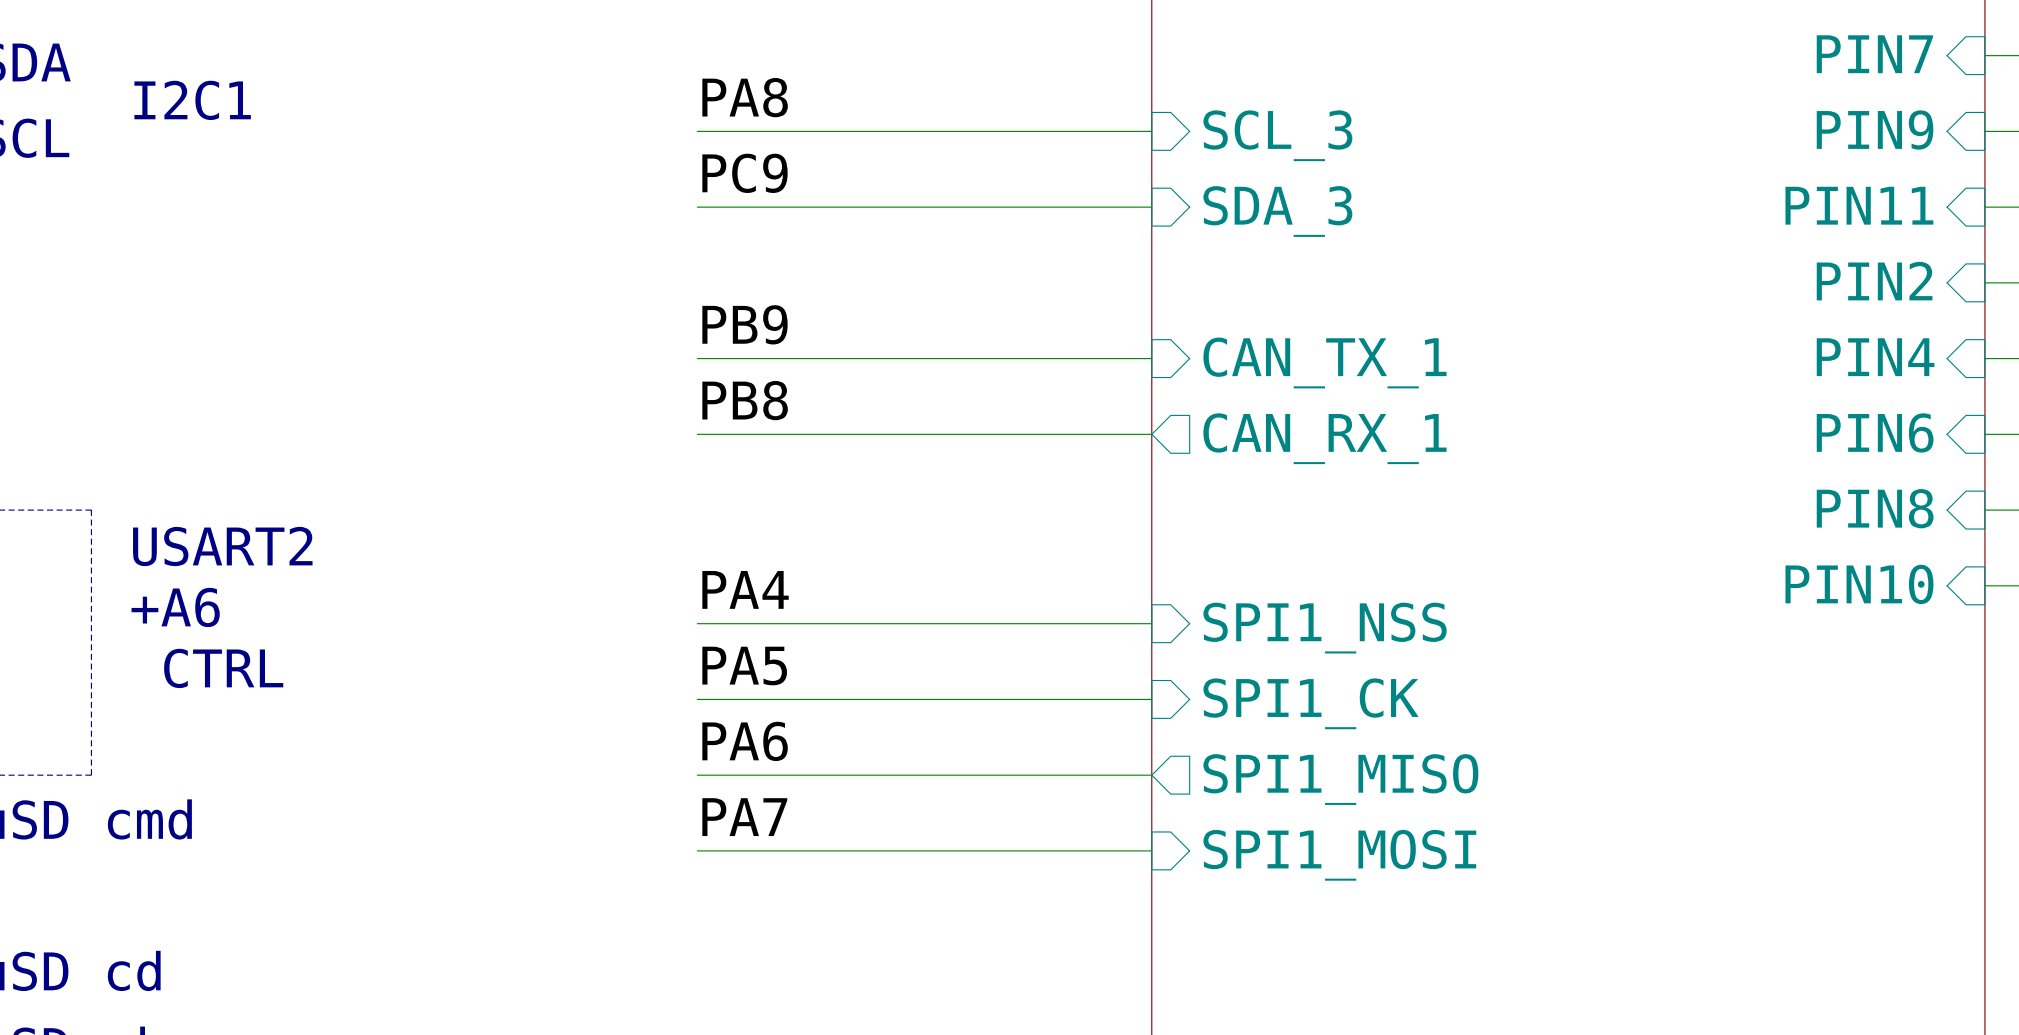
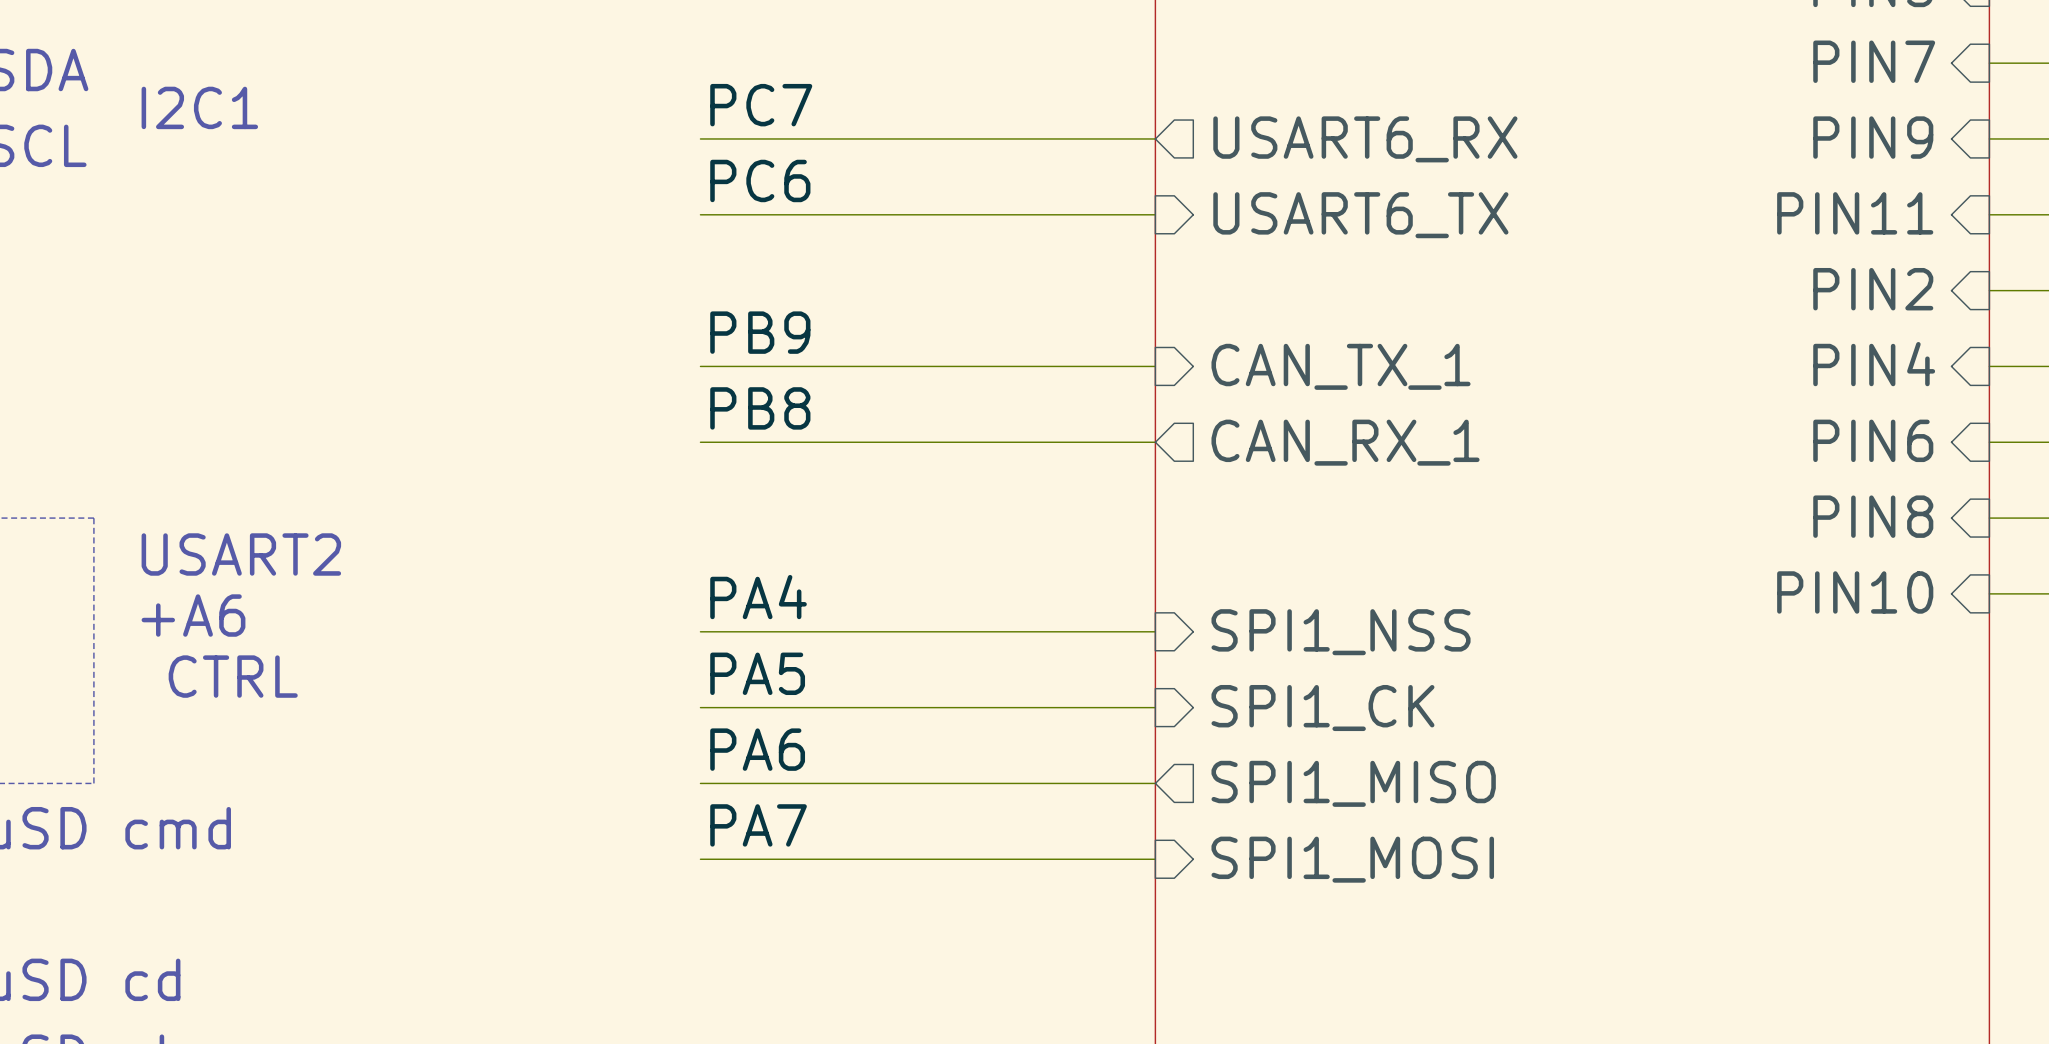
label: PA8 (745, 97) -> PC7 (761, 105)
sheet pin shape: input (1277, 135) -> output (1365, 139)
sheet pin: SCL_3 (1277, 135) -> USART6_RX (1365, 139)
label: PC9 (745, 173) -> PC6 (760, 180)
sheet pin: SDA_3 (1277, 211) -> USART6_TX (1360, 215)

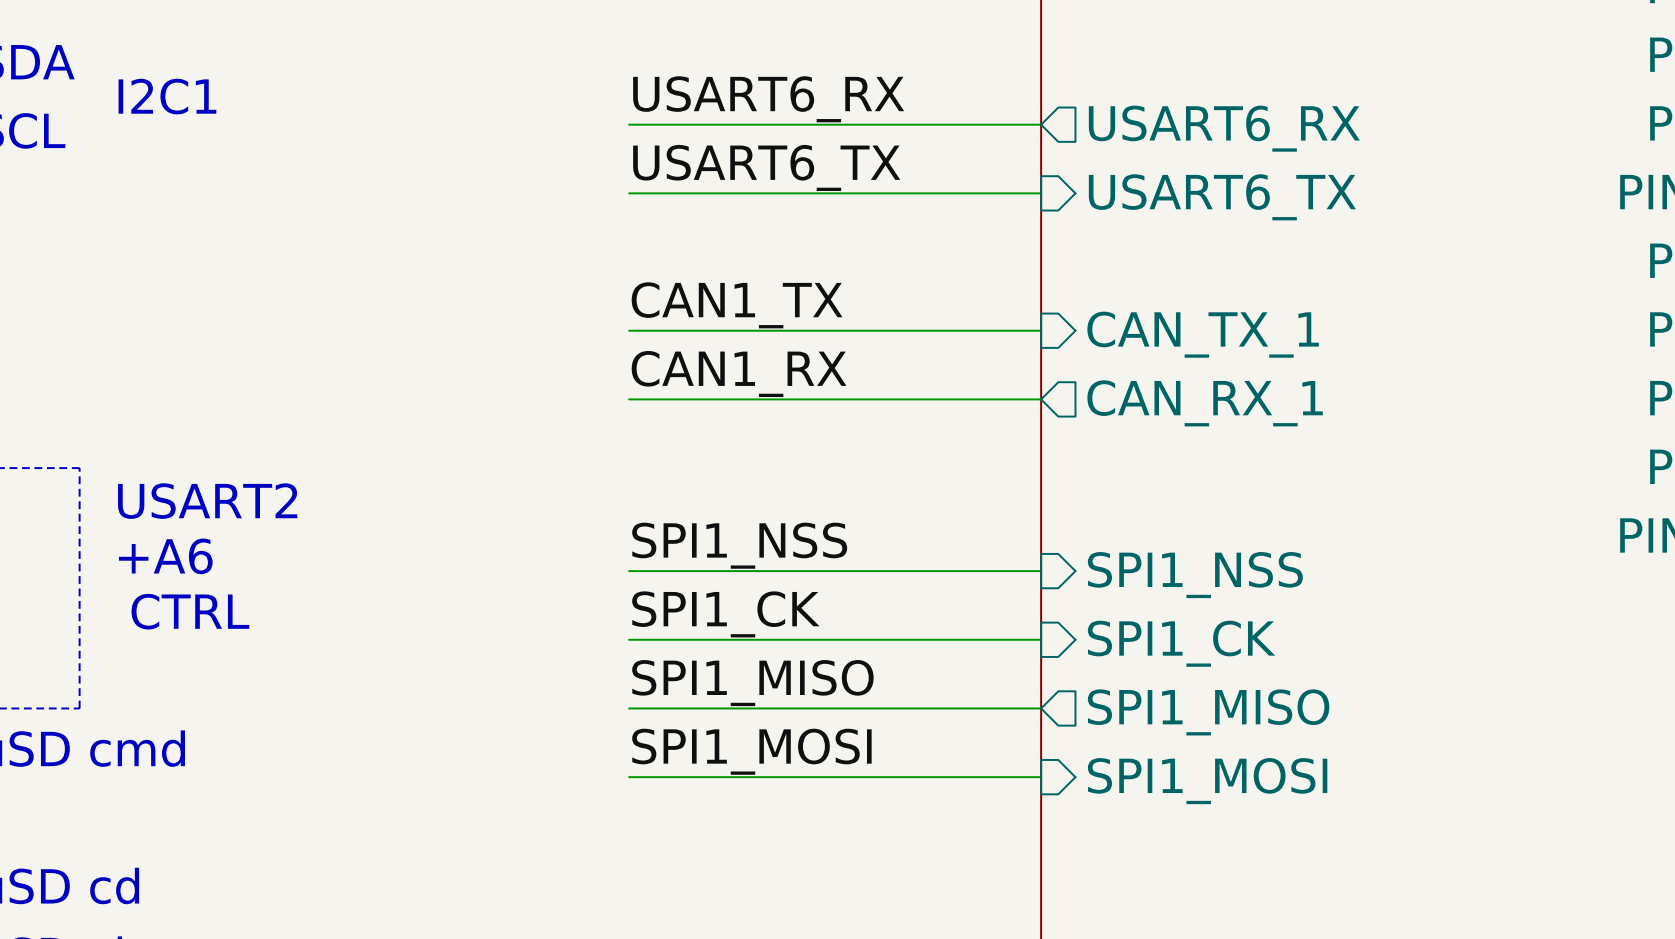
label: PC7 (761, 105) -> USART6_RX (768, 99)
label: PC6 (760, 180) -> USART6_TX (766, 167)
label: PB9 (760, 332) -> CAN1_TX (737, 305)
label: PB8 (760, 408) -> CAN1_RX (739, 374)
label: PA4 (758, 597) -> SPI1_NSS (739, 545)
label: PA5 (757, 673) -> SPI1_CK (725, 614)
label: PA6 (757, 749) -> SPI1_MISO (752, 683)
label: PA7 (758, 825) -> SPI1_MOSI (751, 751)

